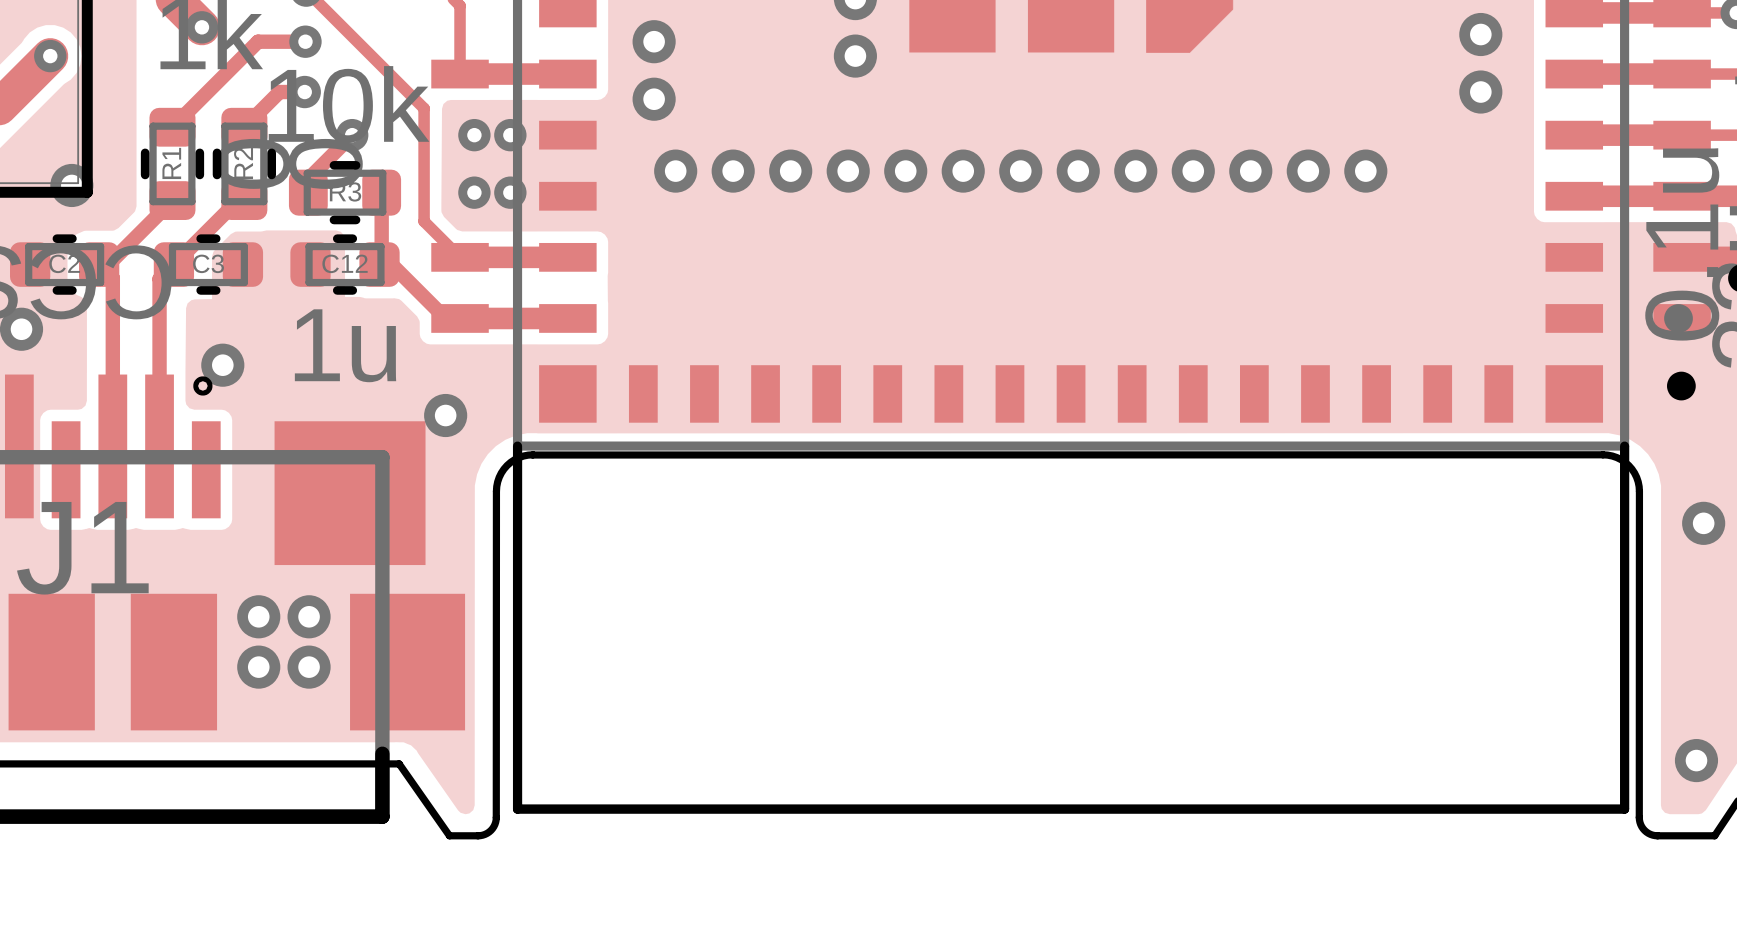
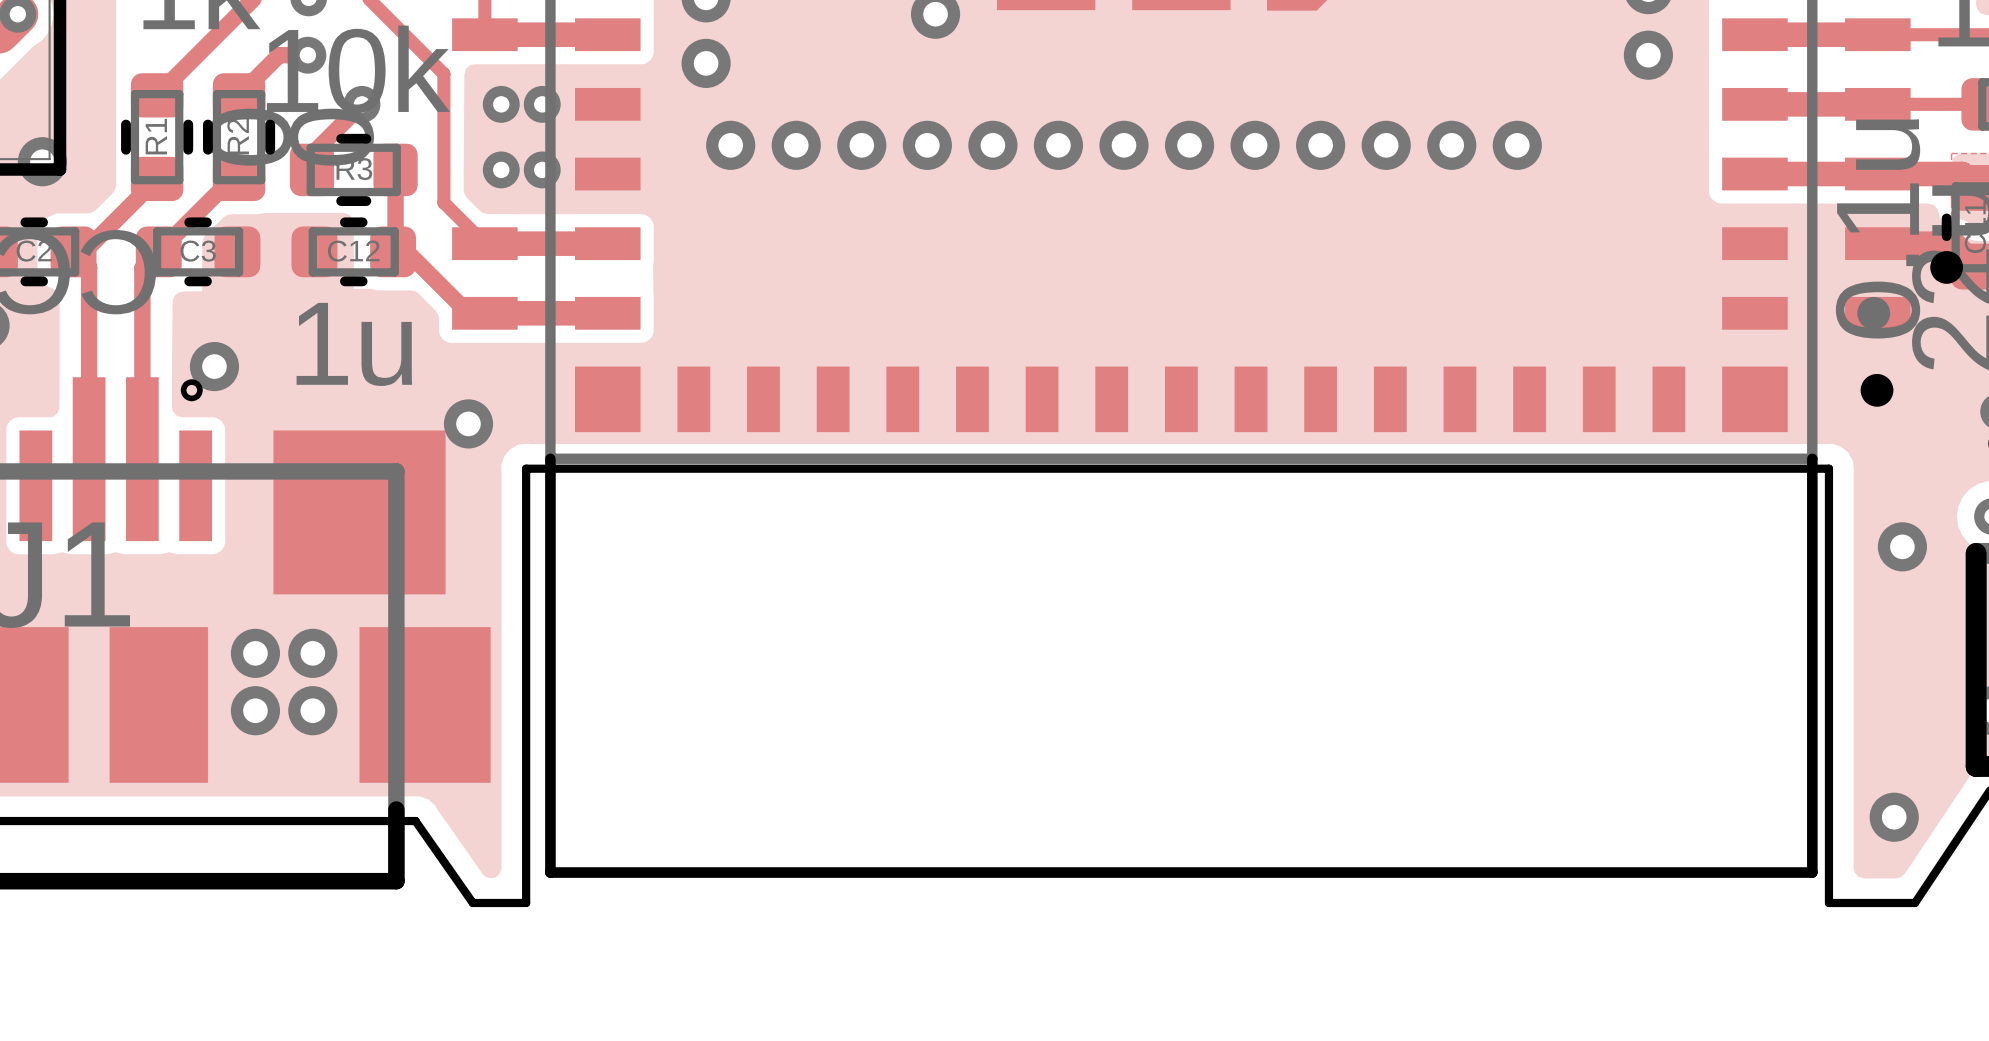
board edge: (478, 835) (490, 830) (496, 817) (496, 486) (501, 473) (507, 465) (518, 457) (532, 454) (1612, 456) (1628, 465) (1634, 473) (1639, 486) (1639, 817) (1644, 830) (1657, 835) -> (505, 902) (526, 902) (526, 468) (1828, 468) (1828, 902) (1849, 902)

